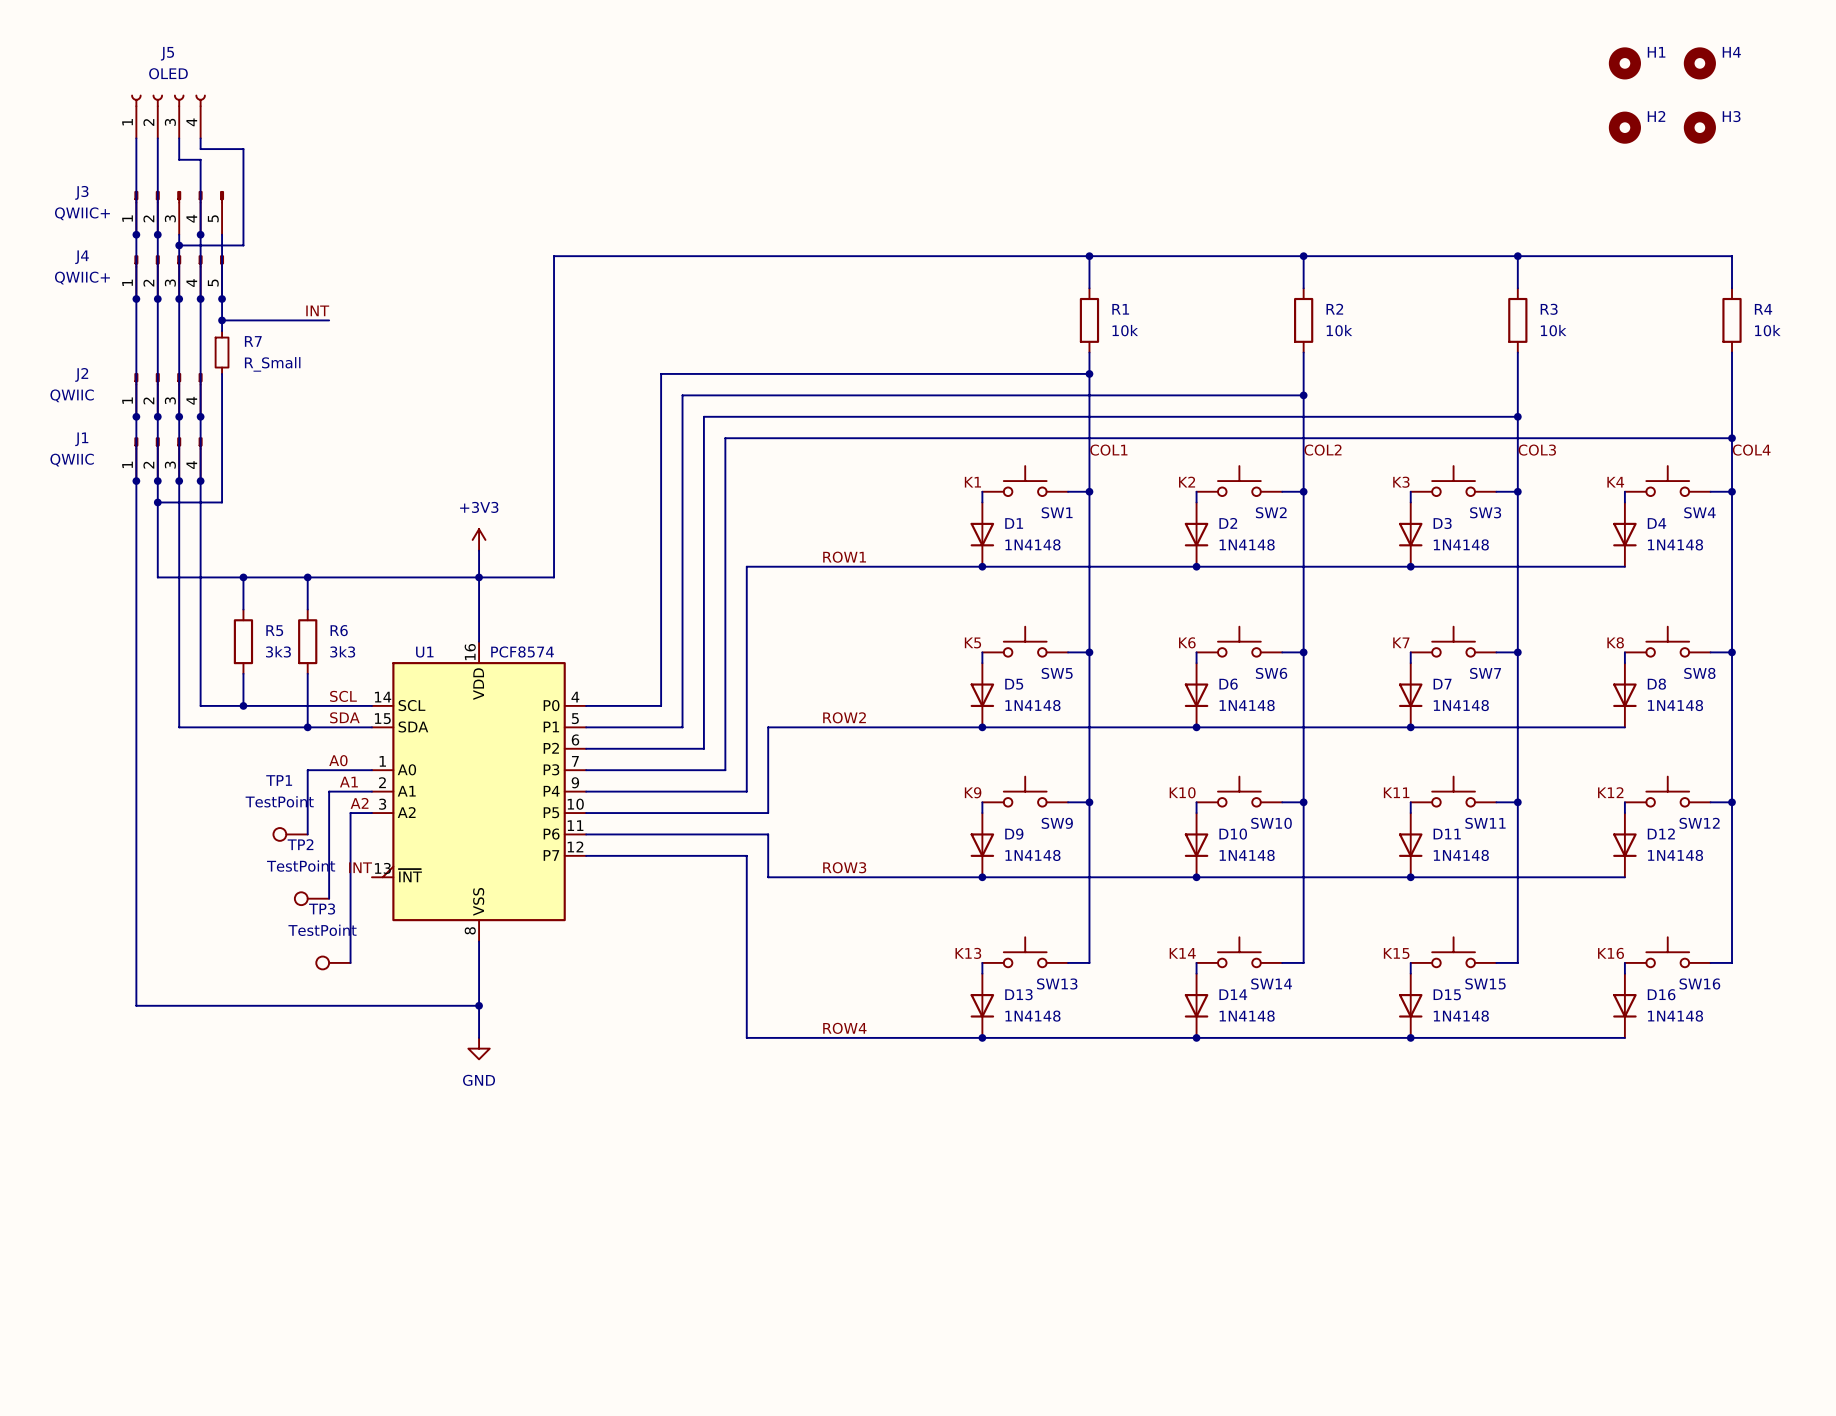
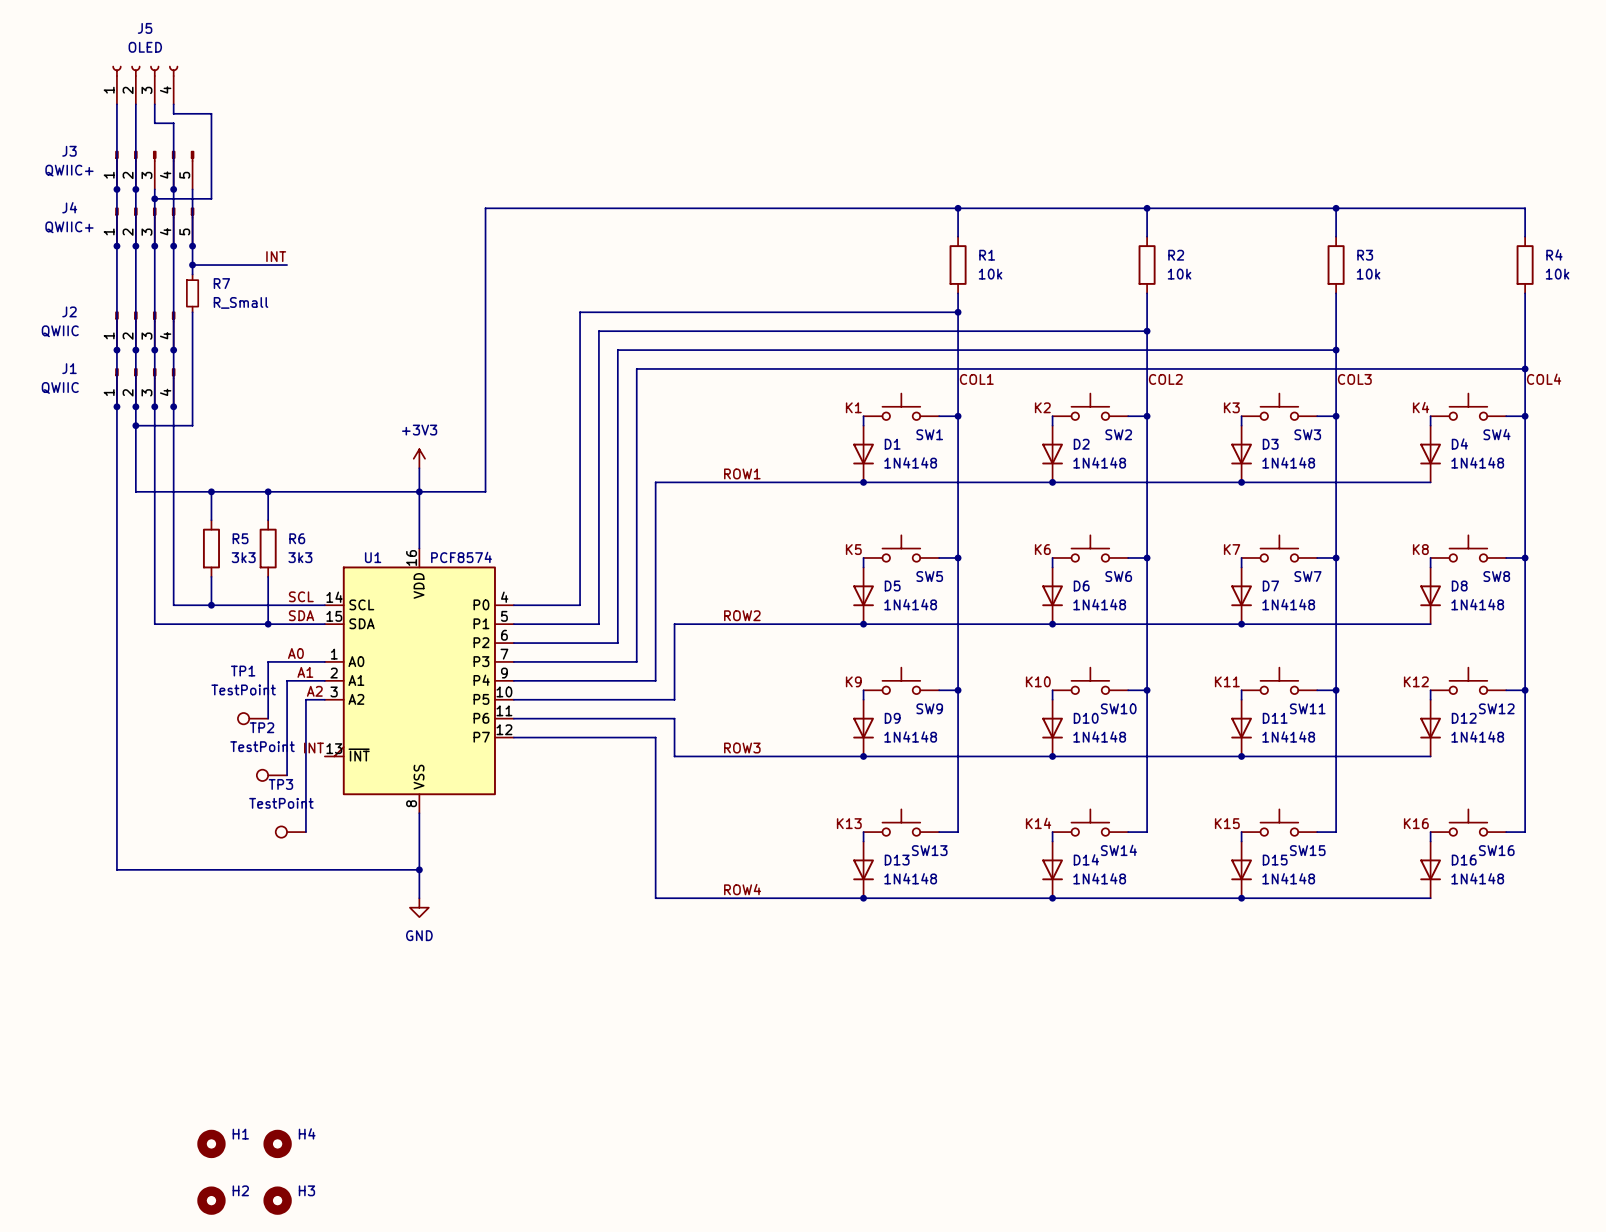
H1 position: (1624, 63) -> (211, 1143)
H4 position: (1699, 63) -> (277, 1143)
H2 position: (1624, 127) -> (211, 1200)
H3 position: (1699, 127) -> (277, 1200)

